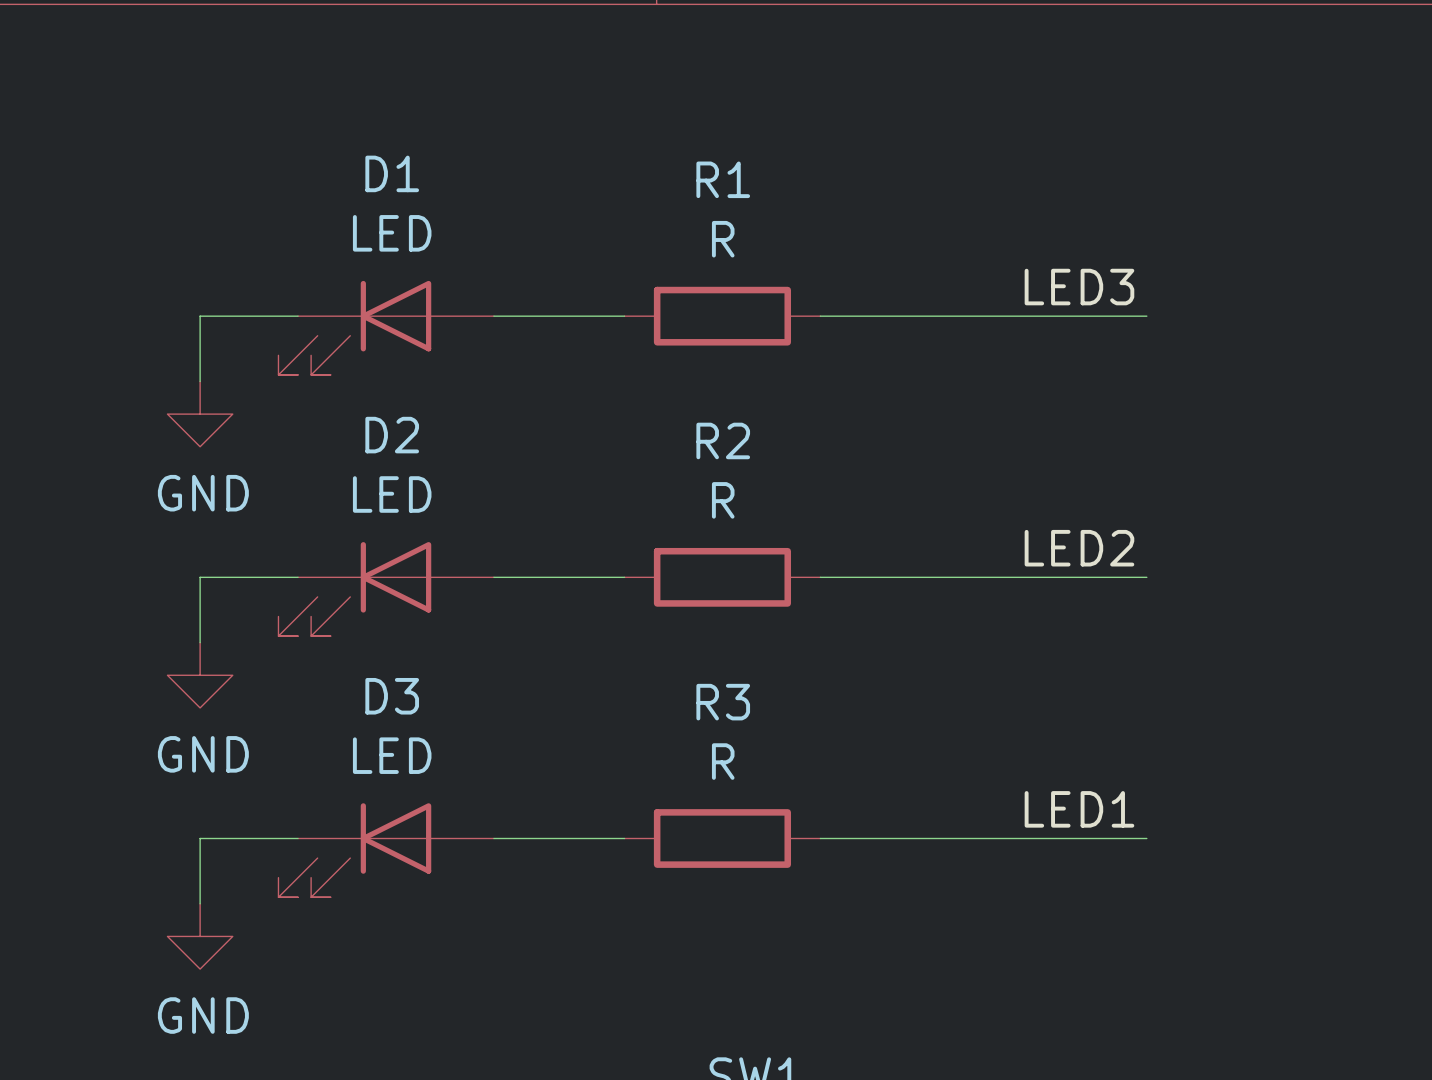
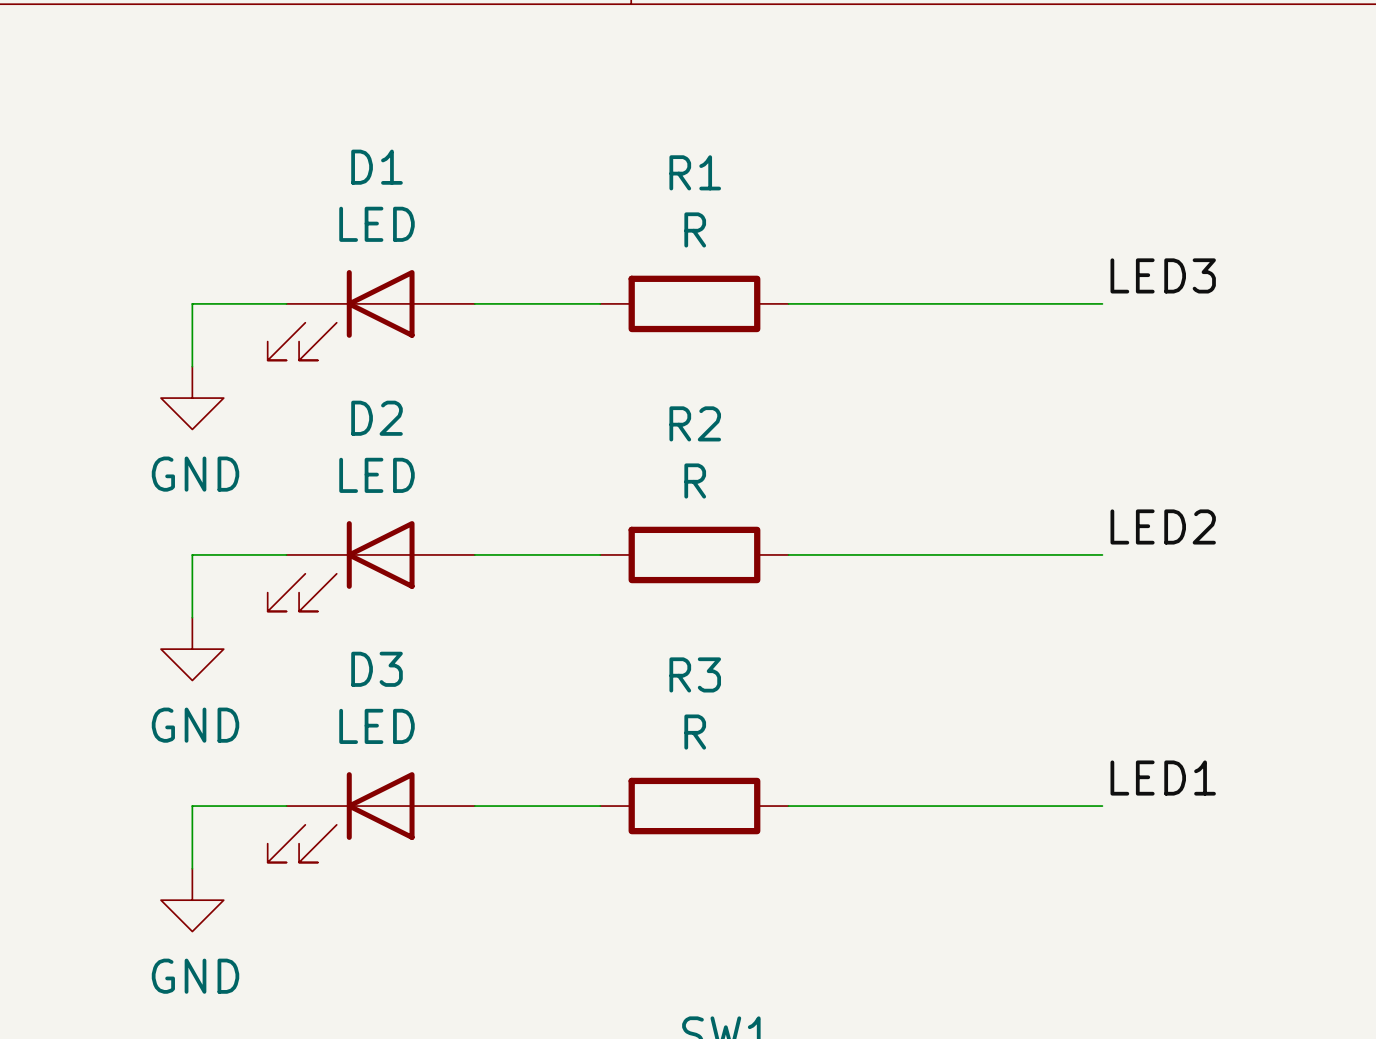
label position: LED3 (1079, 287) -> LED3 (1163, 275)
label position: LED2 (1079, 548) -> LED2 (1163, 526)
label position: LED1 (1079, 809) -> LED1 (1163, 778)

